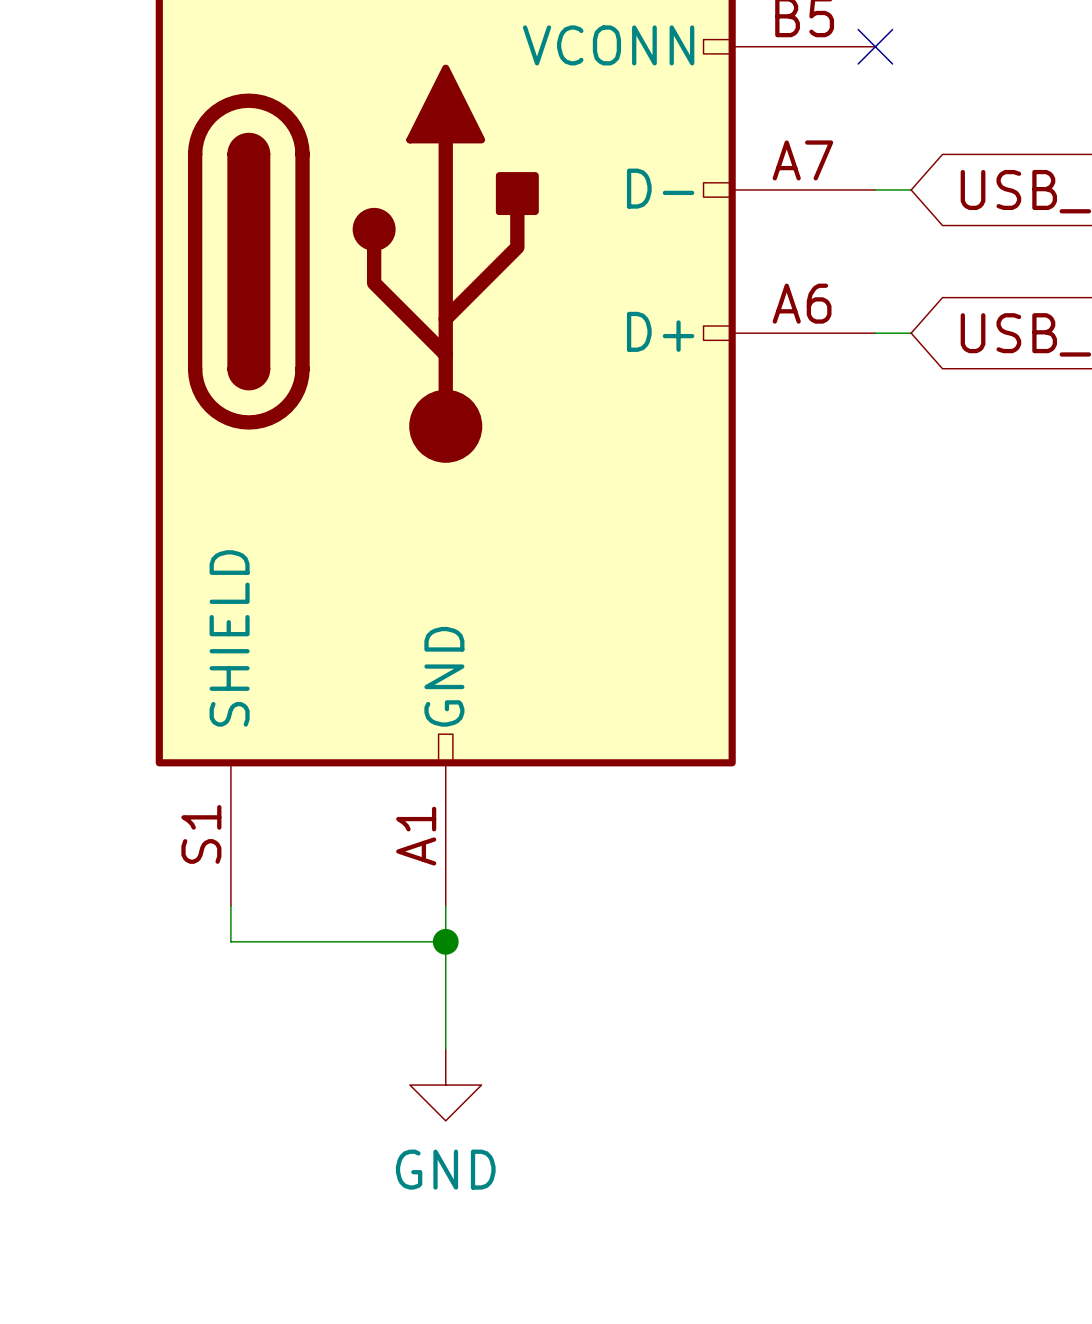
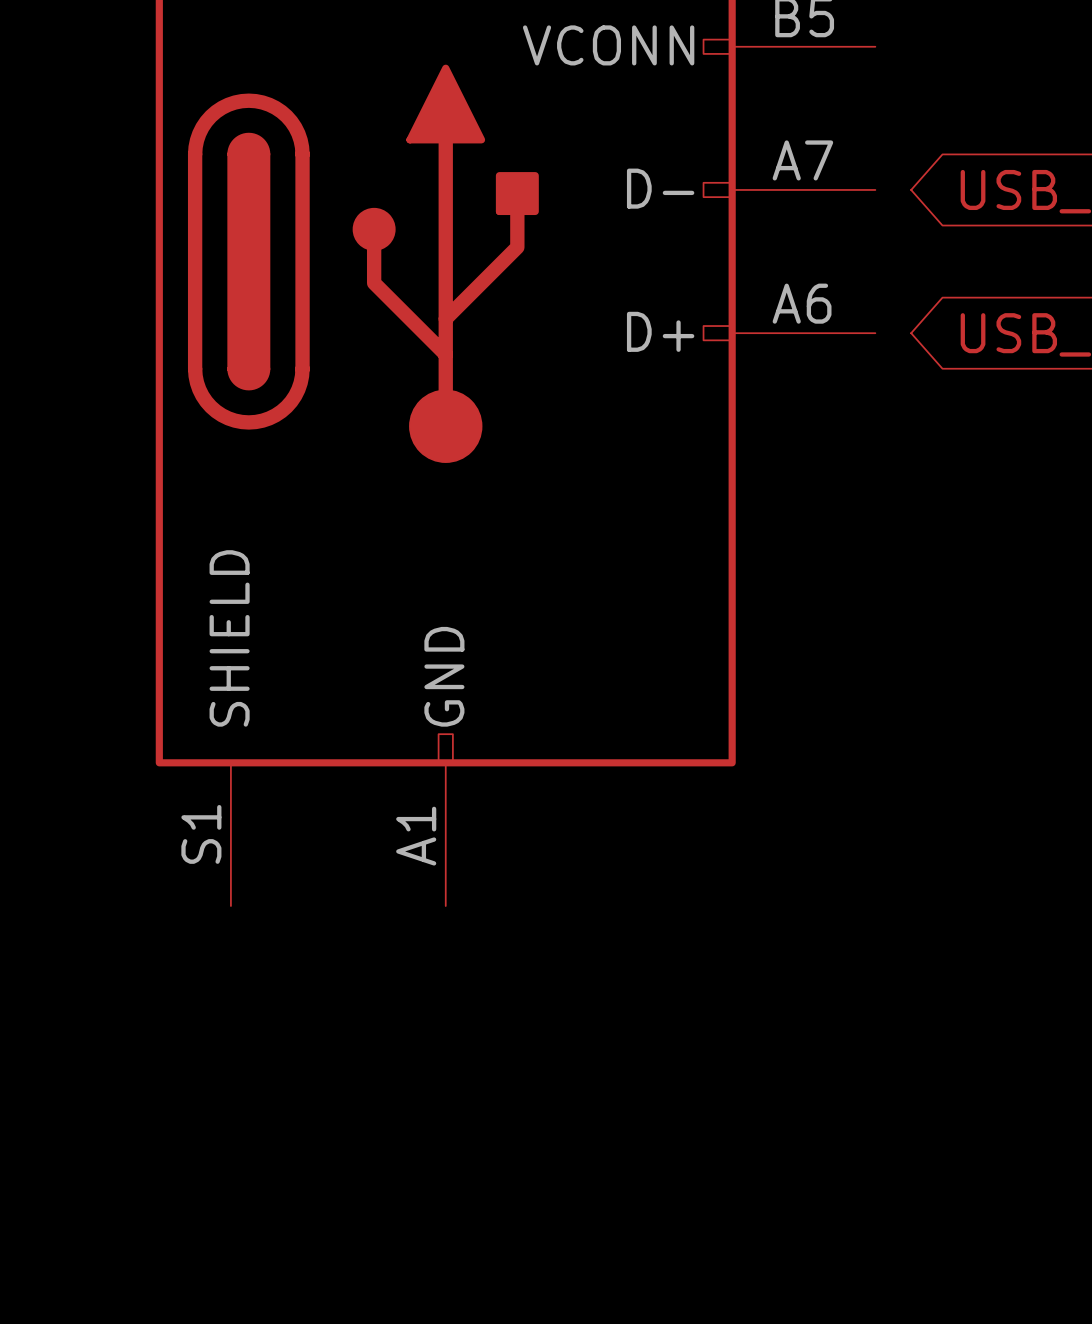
no-connect mark: (875, 46) -> none
wire: (875, 189) (911, 189) -> none
wire: (875, 333) (911, 333) -> none
wire: (230, 906) (230, 941) (445, 941) -> none
wire: (445, 906) (445, 1049) -> none
junction: (445, 941) -> none
power symbol: GND (445, 1085) -> none

